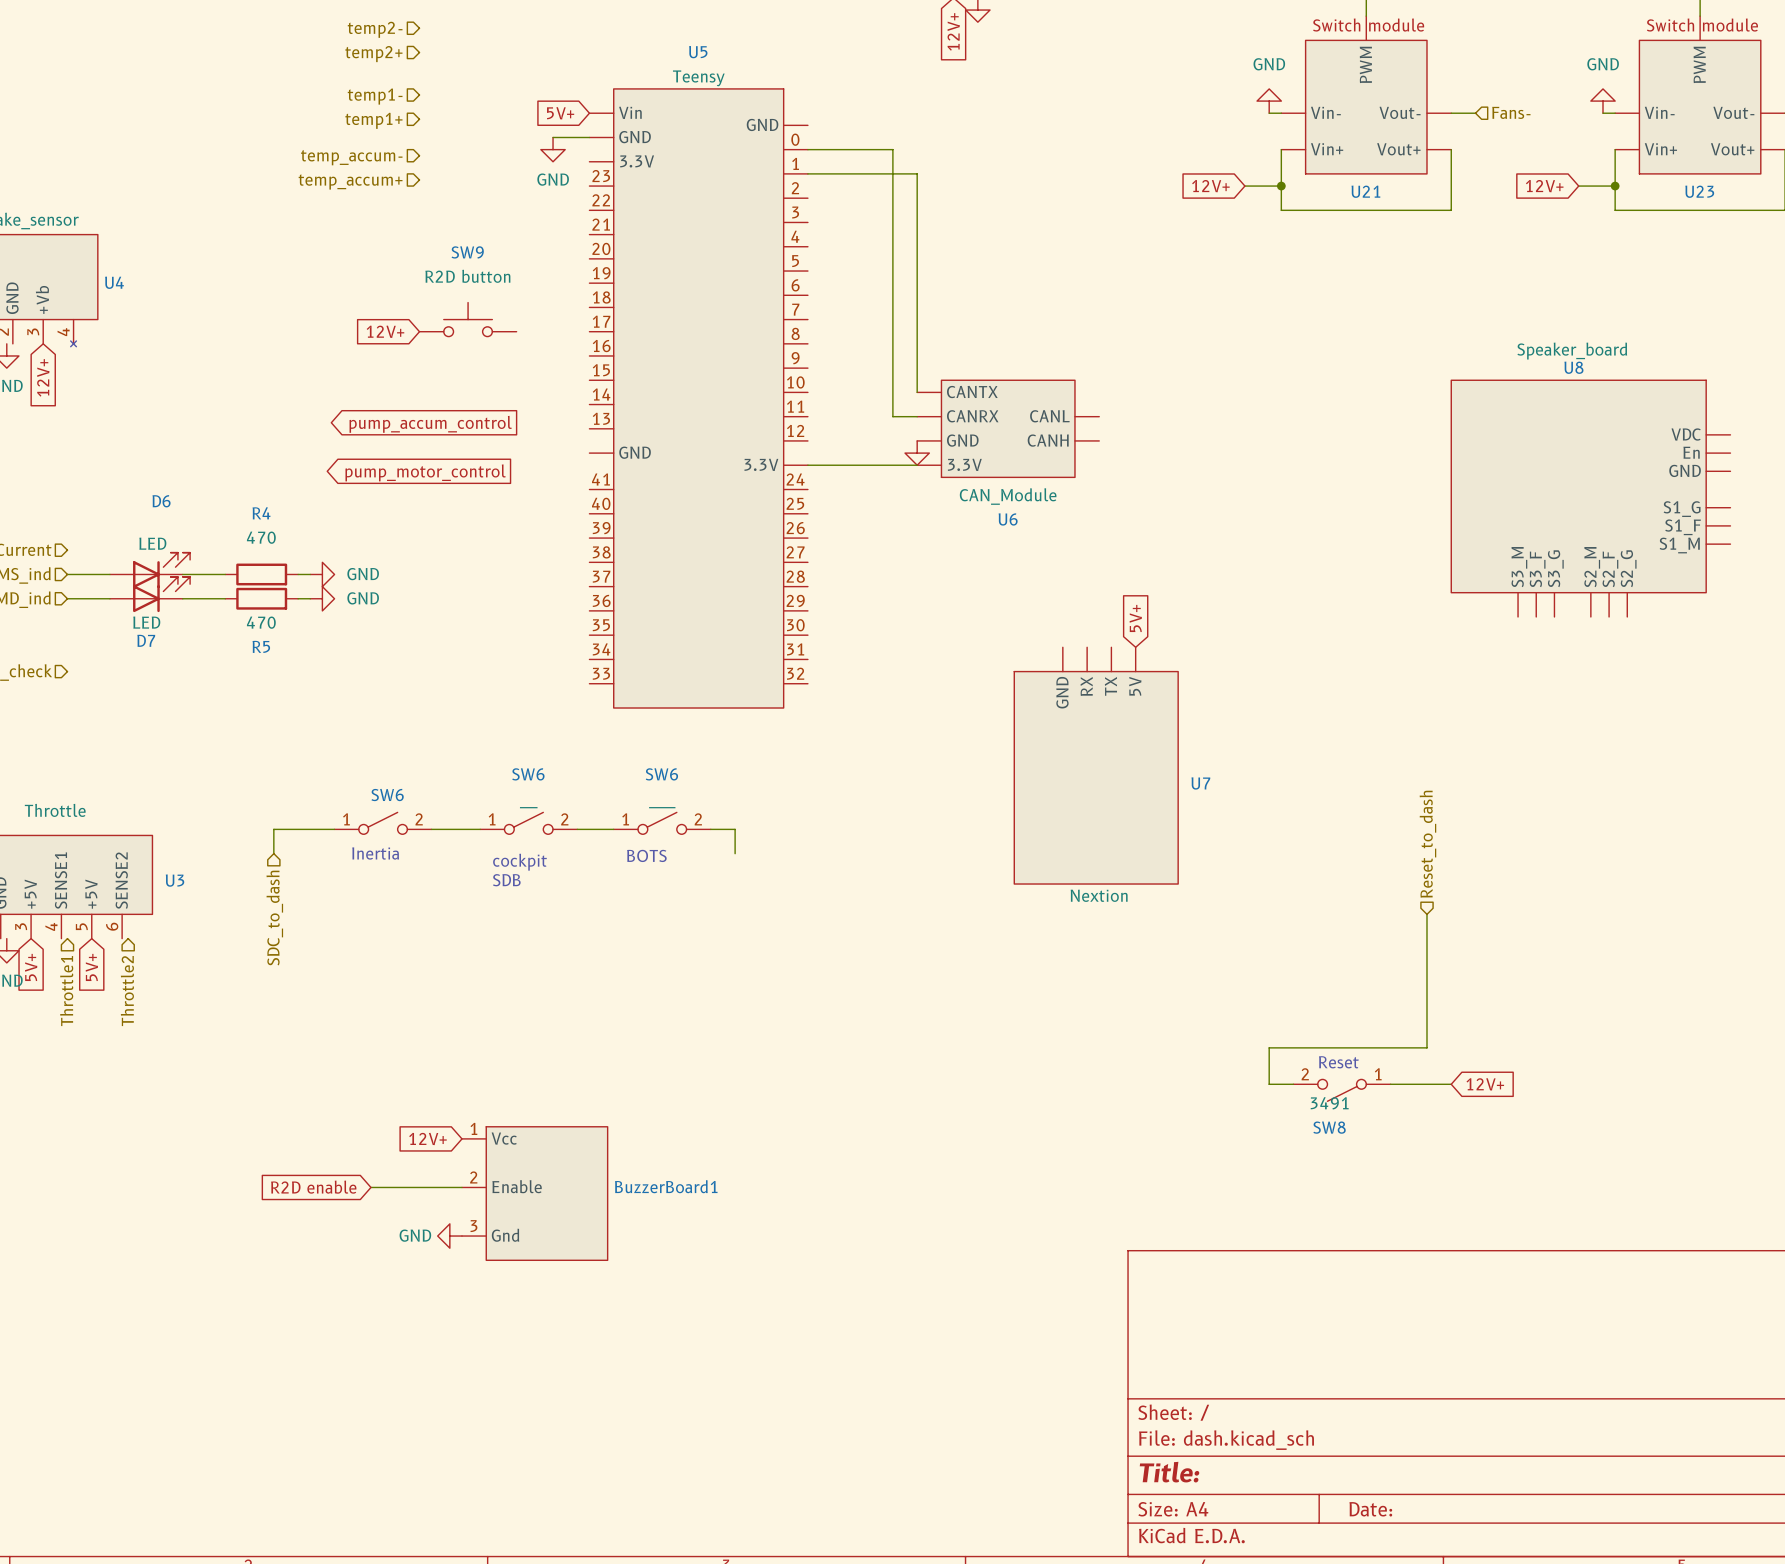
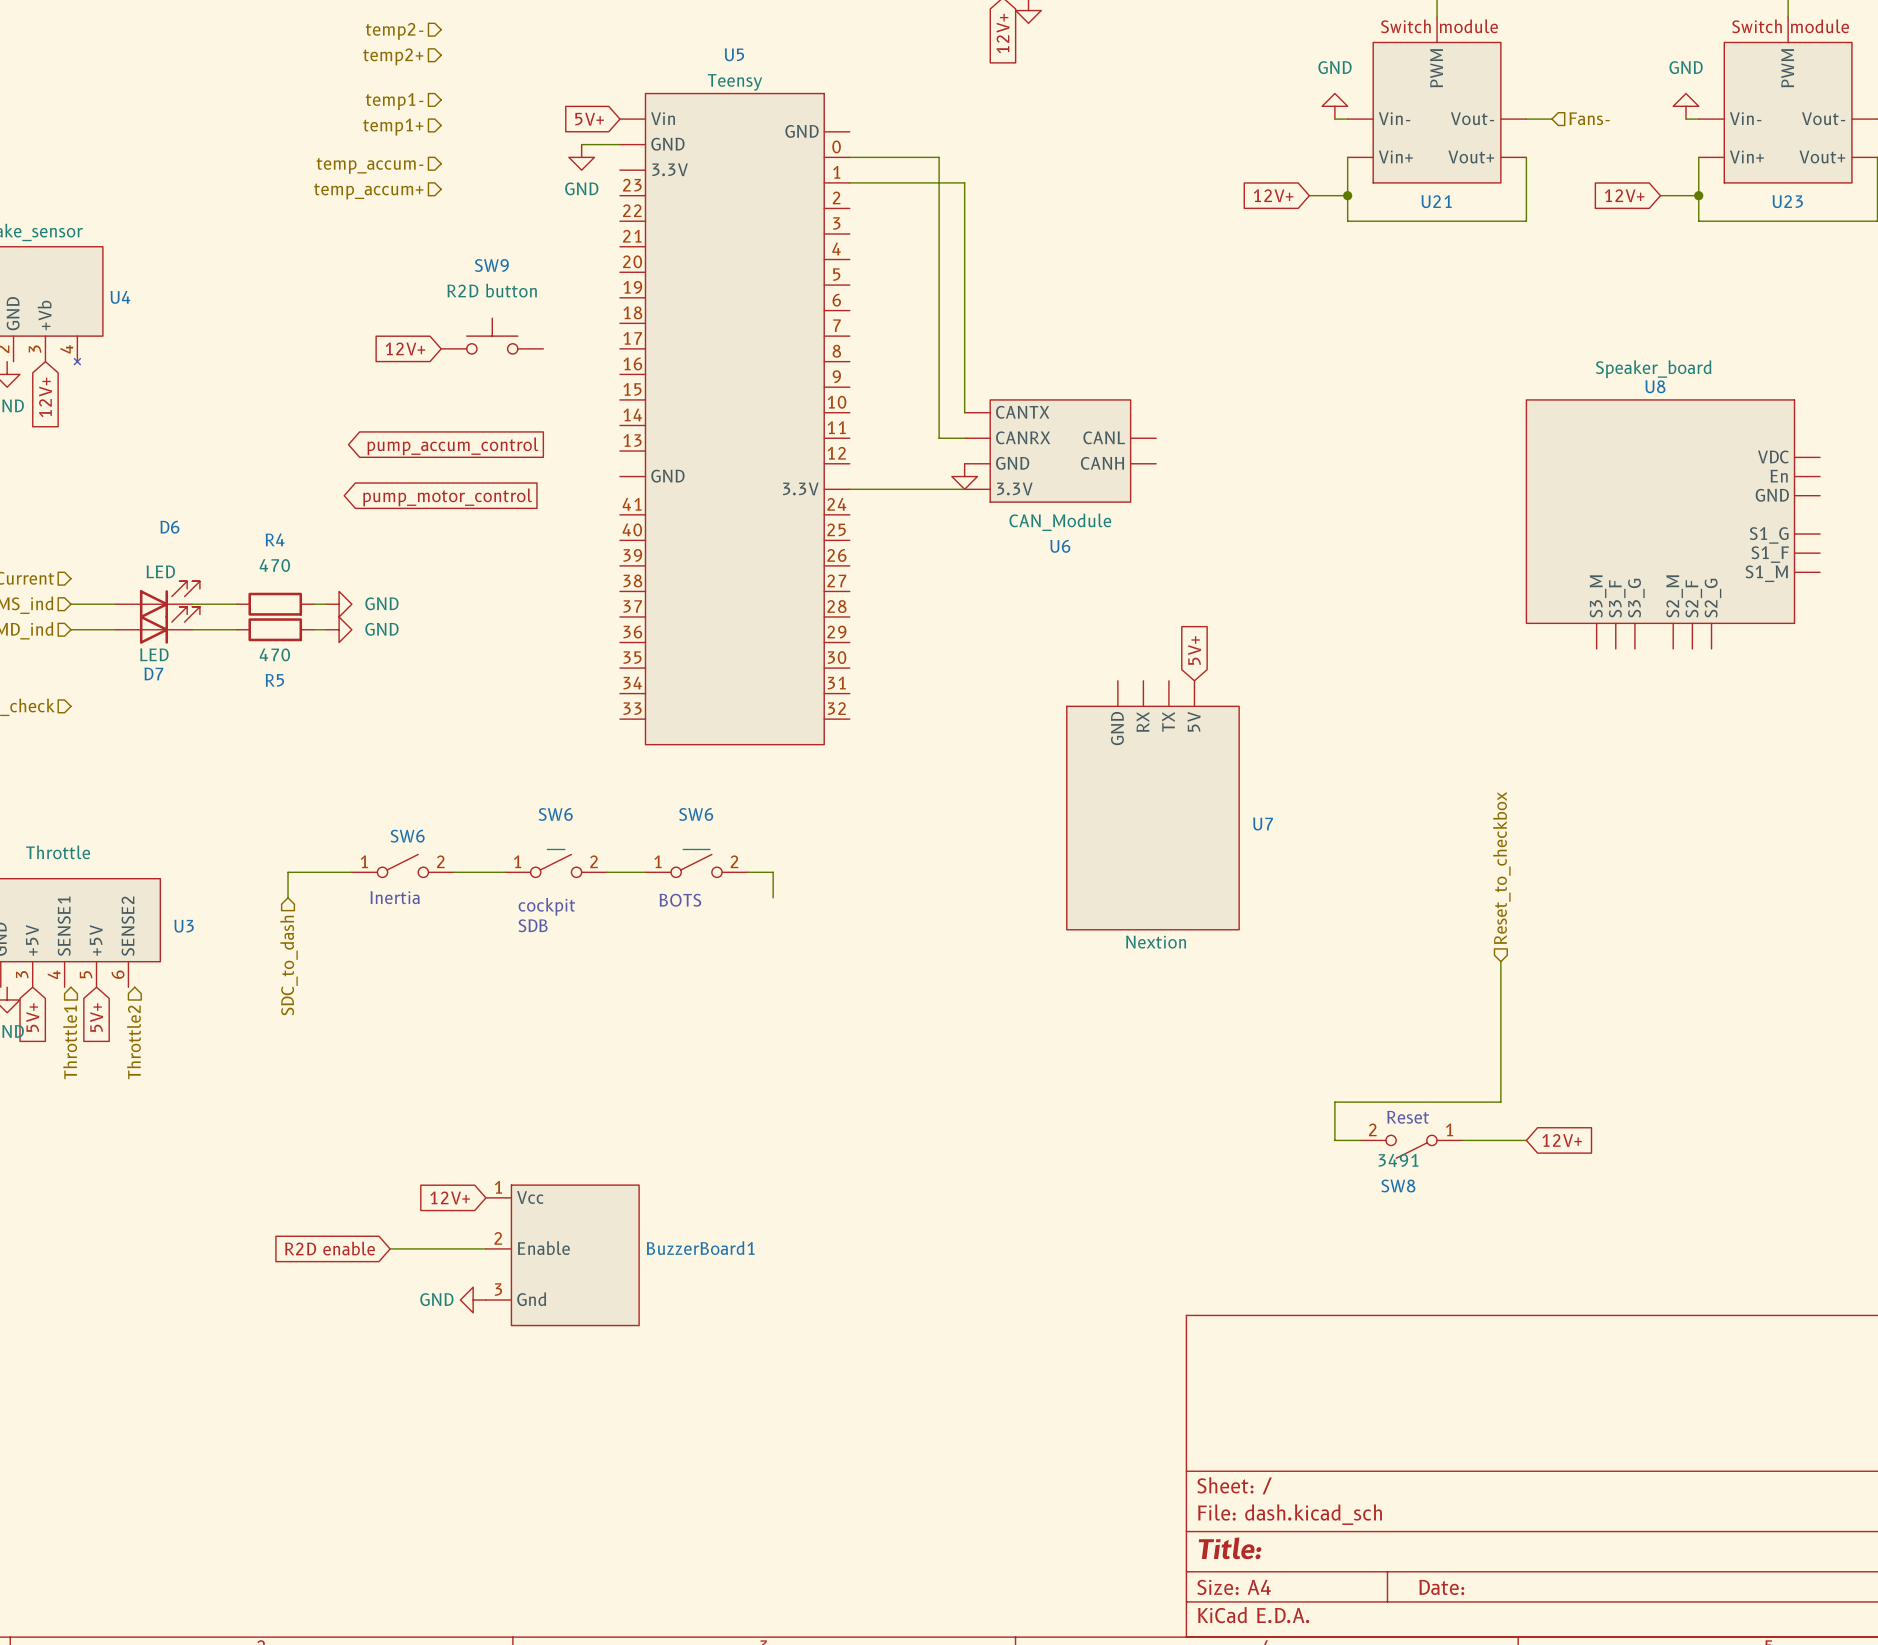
hierarchical label: Reset_to_dash (1427, 844) -> Reset_to_checkbox (1501, 868)

